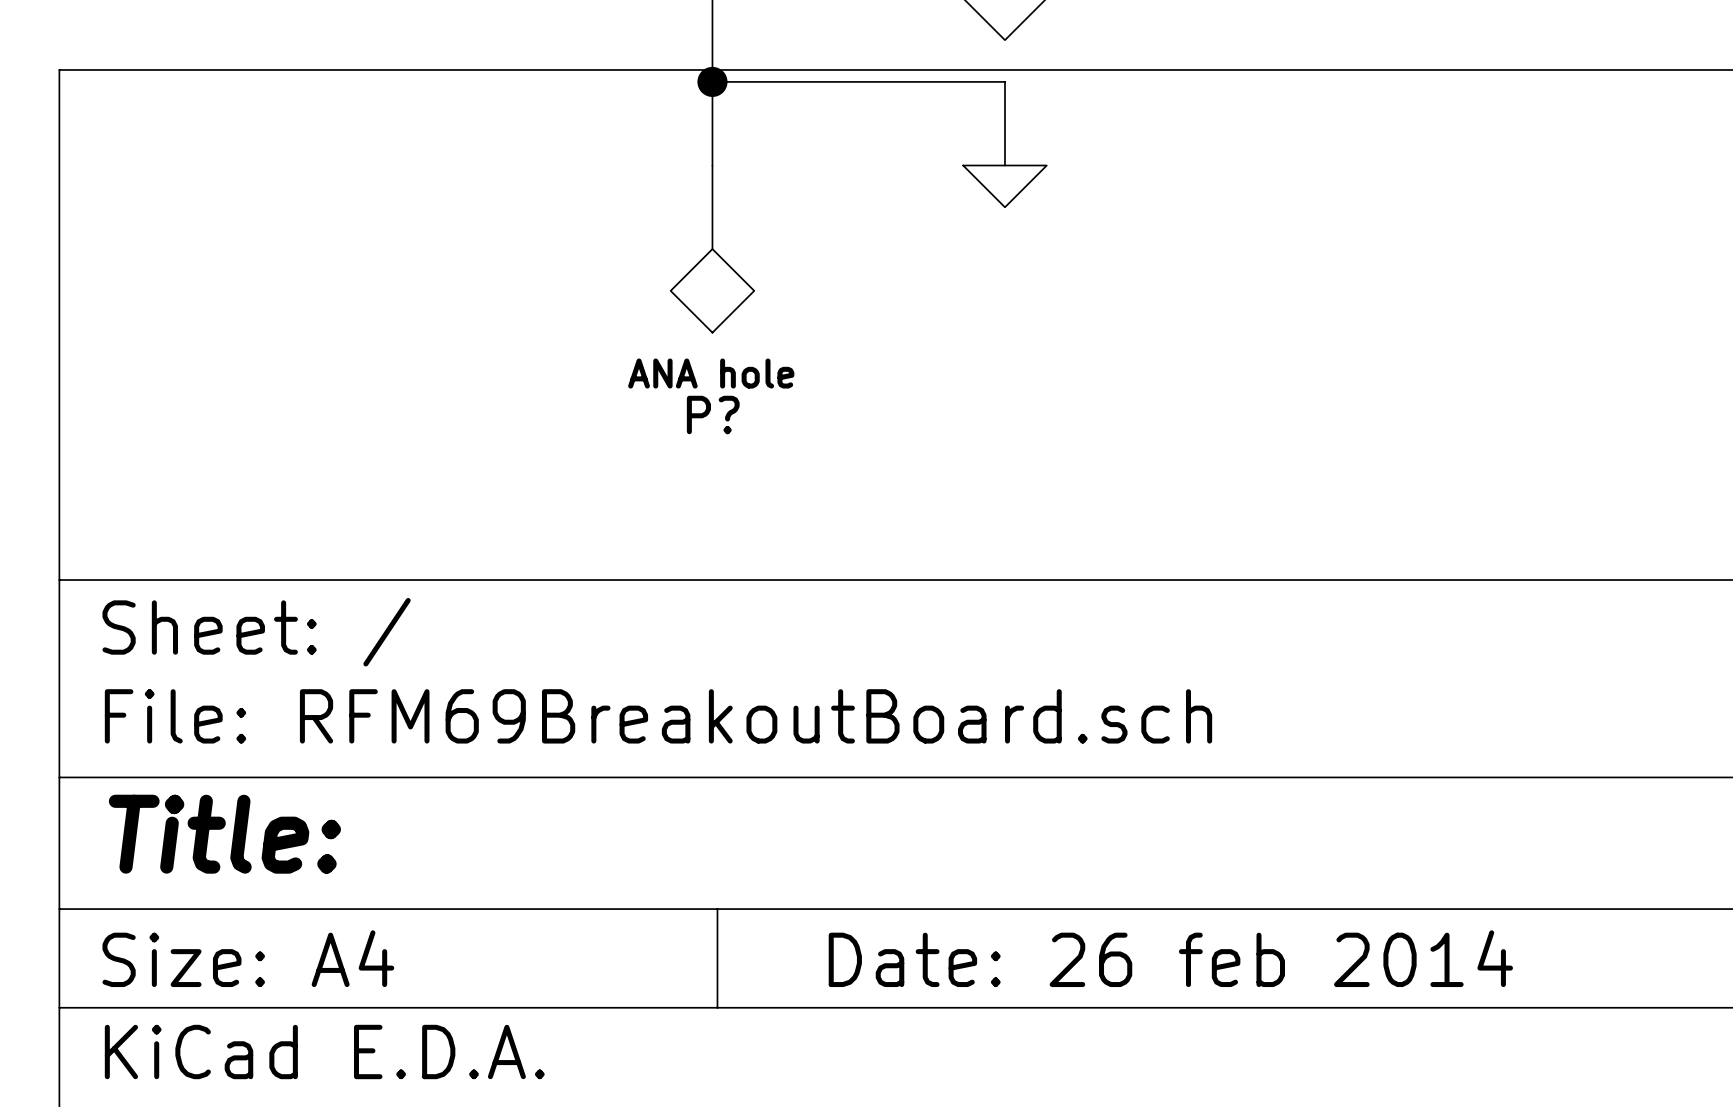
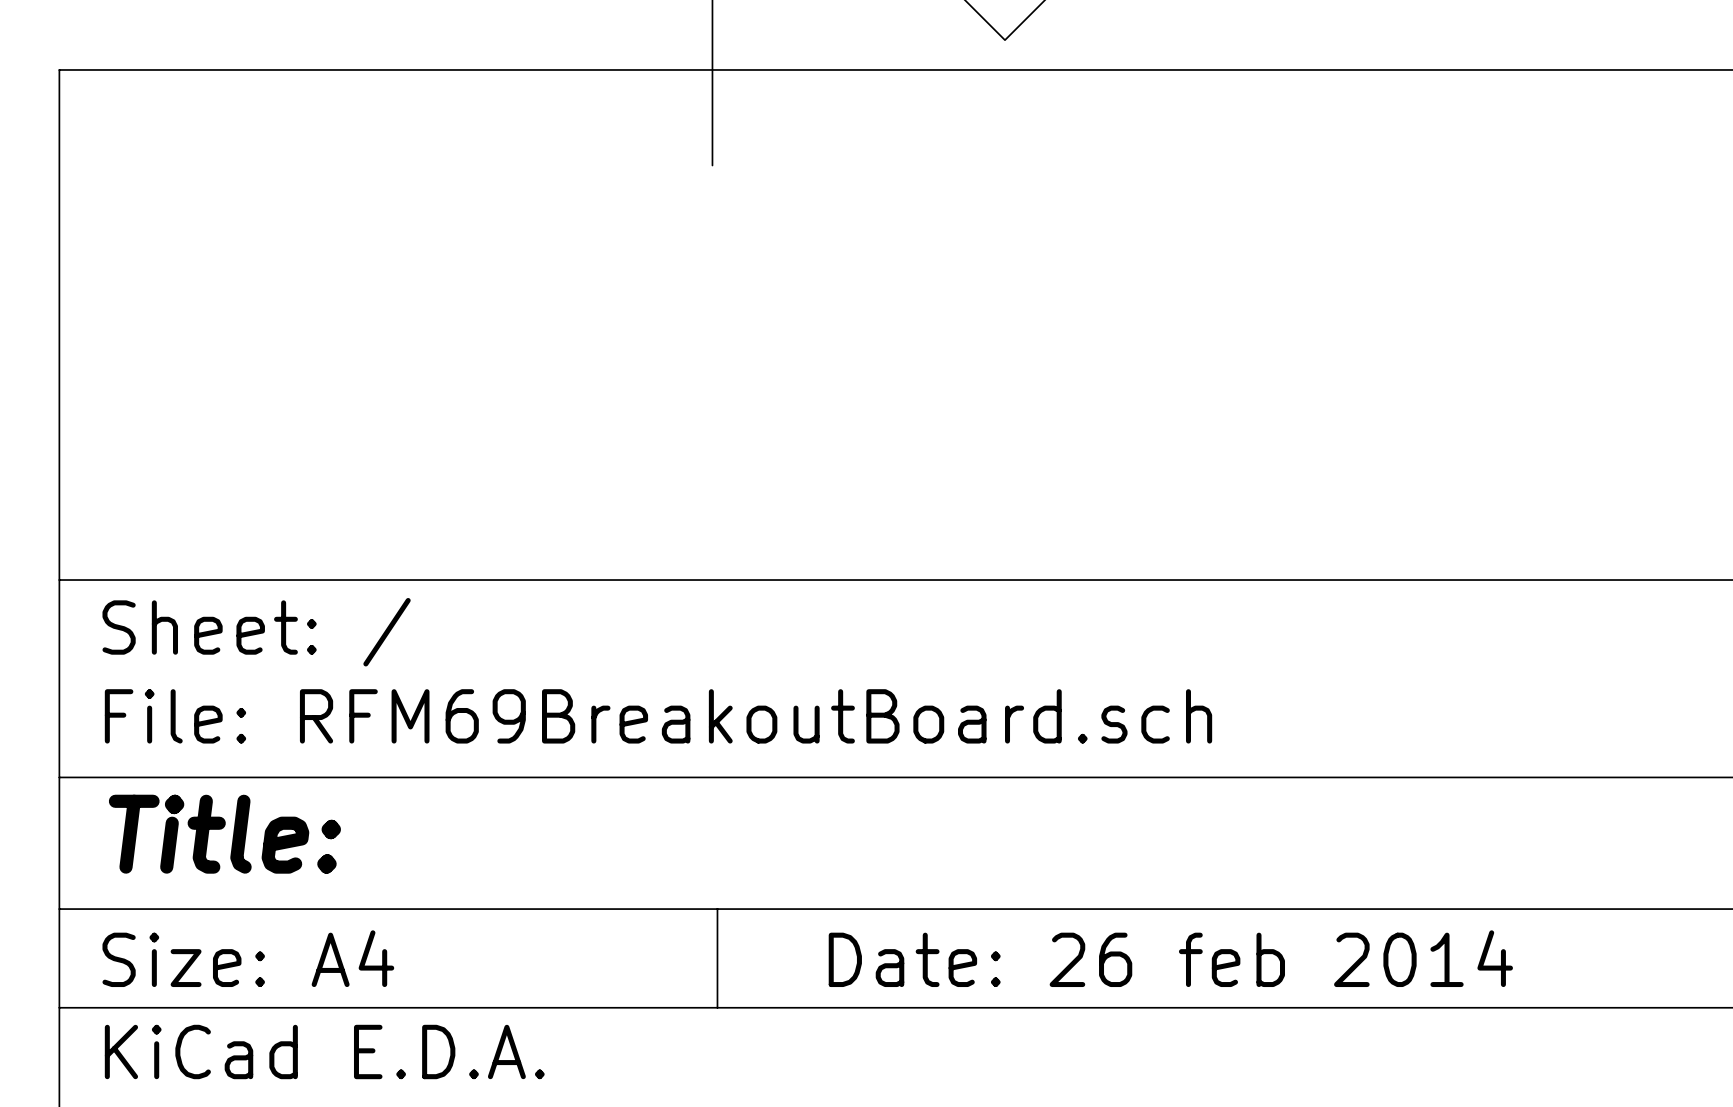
wire: (712, 81) (1004, 81) (1004, 165) -> none
junction: (712, 81) -> none
power symbol: (1004, 186) -> none
P?: ANA hole (712, 249) -> none

